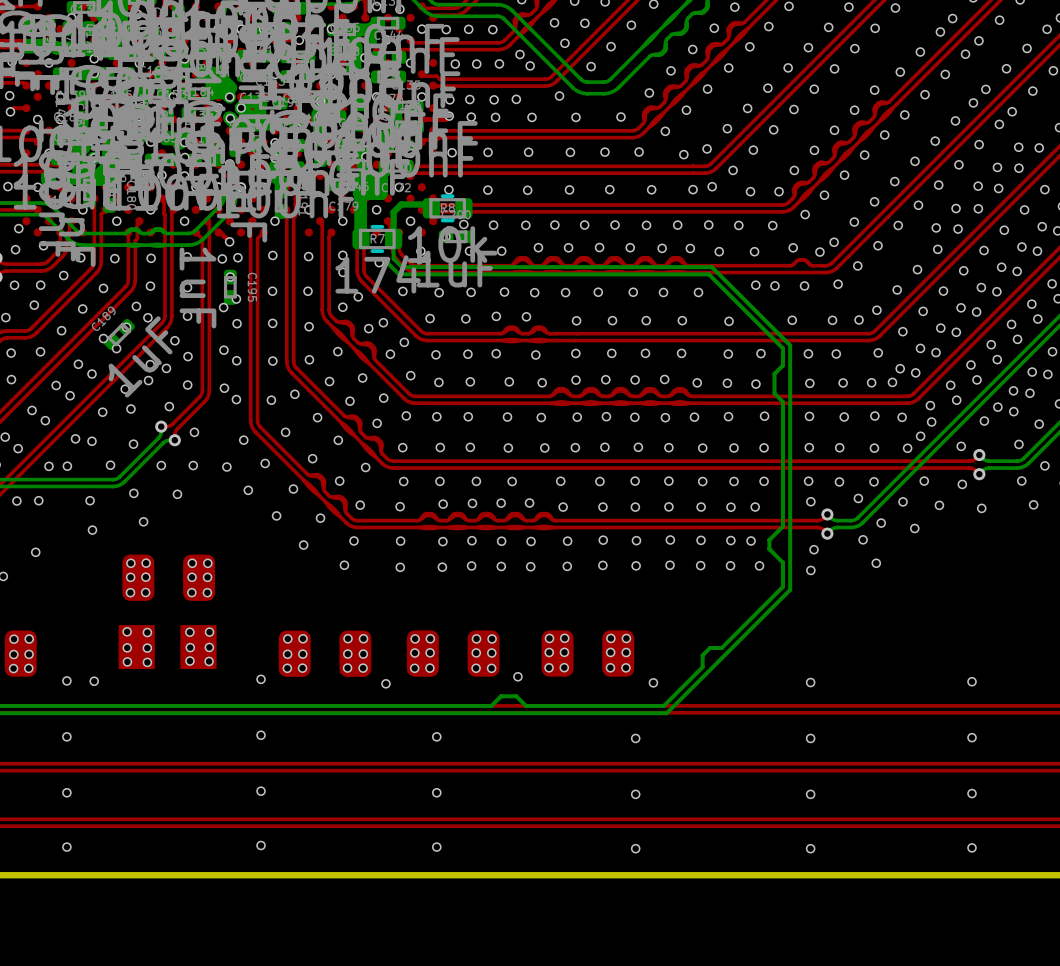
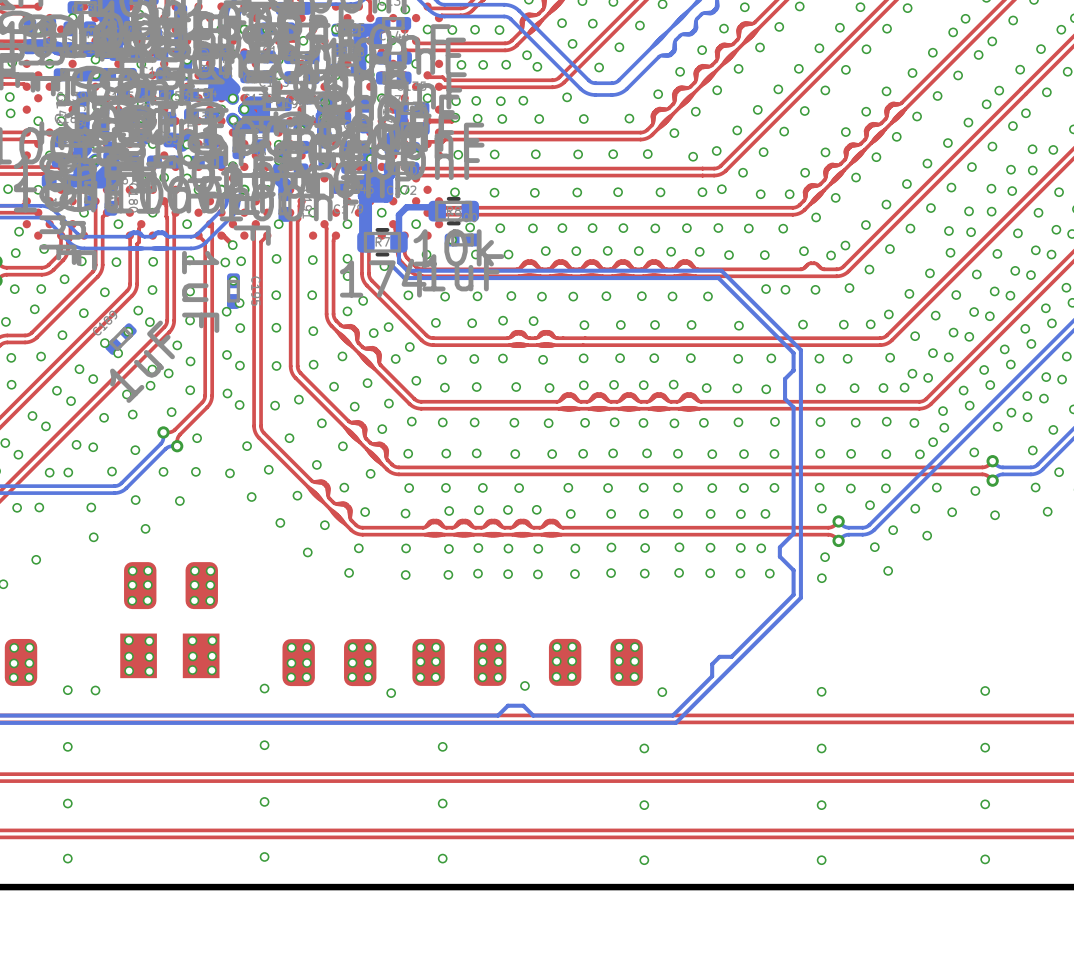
top track: (26, 108) (14, 108) (10, 111) -> none

